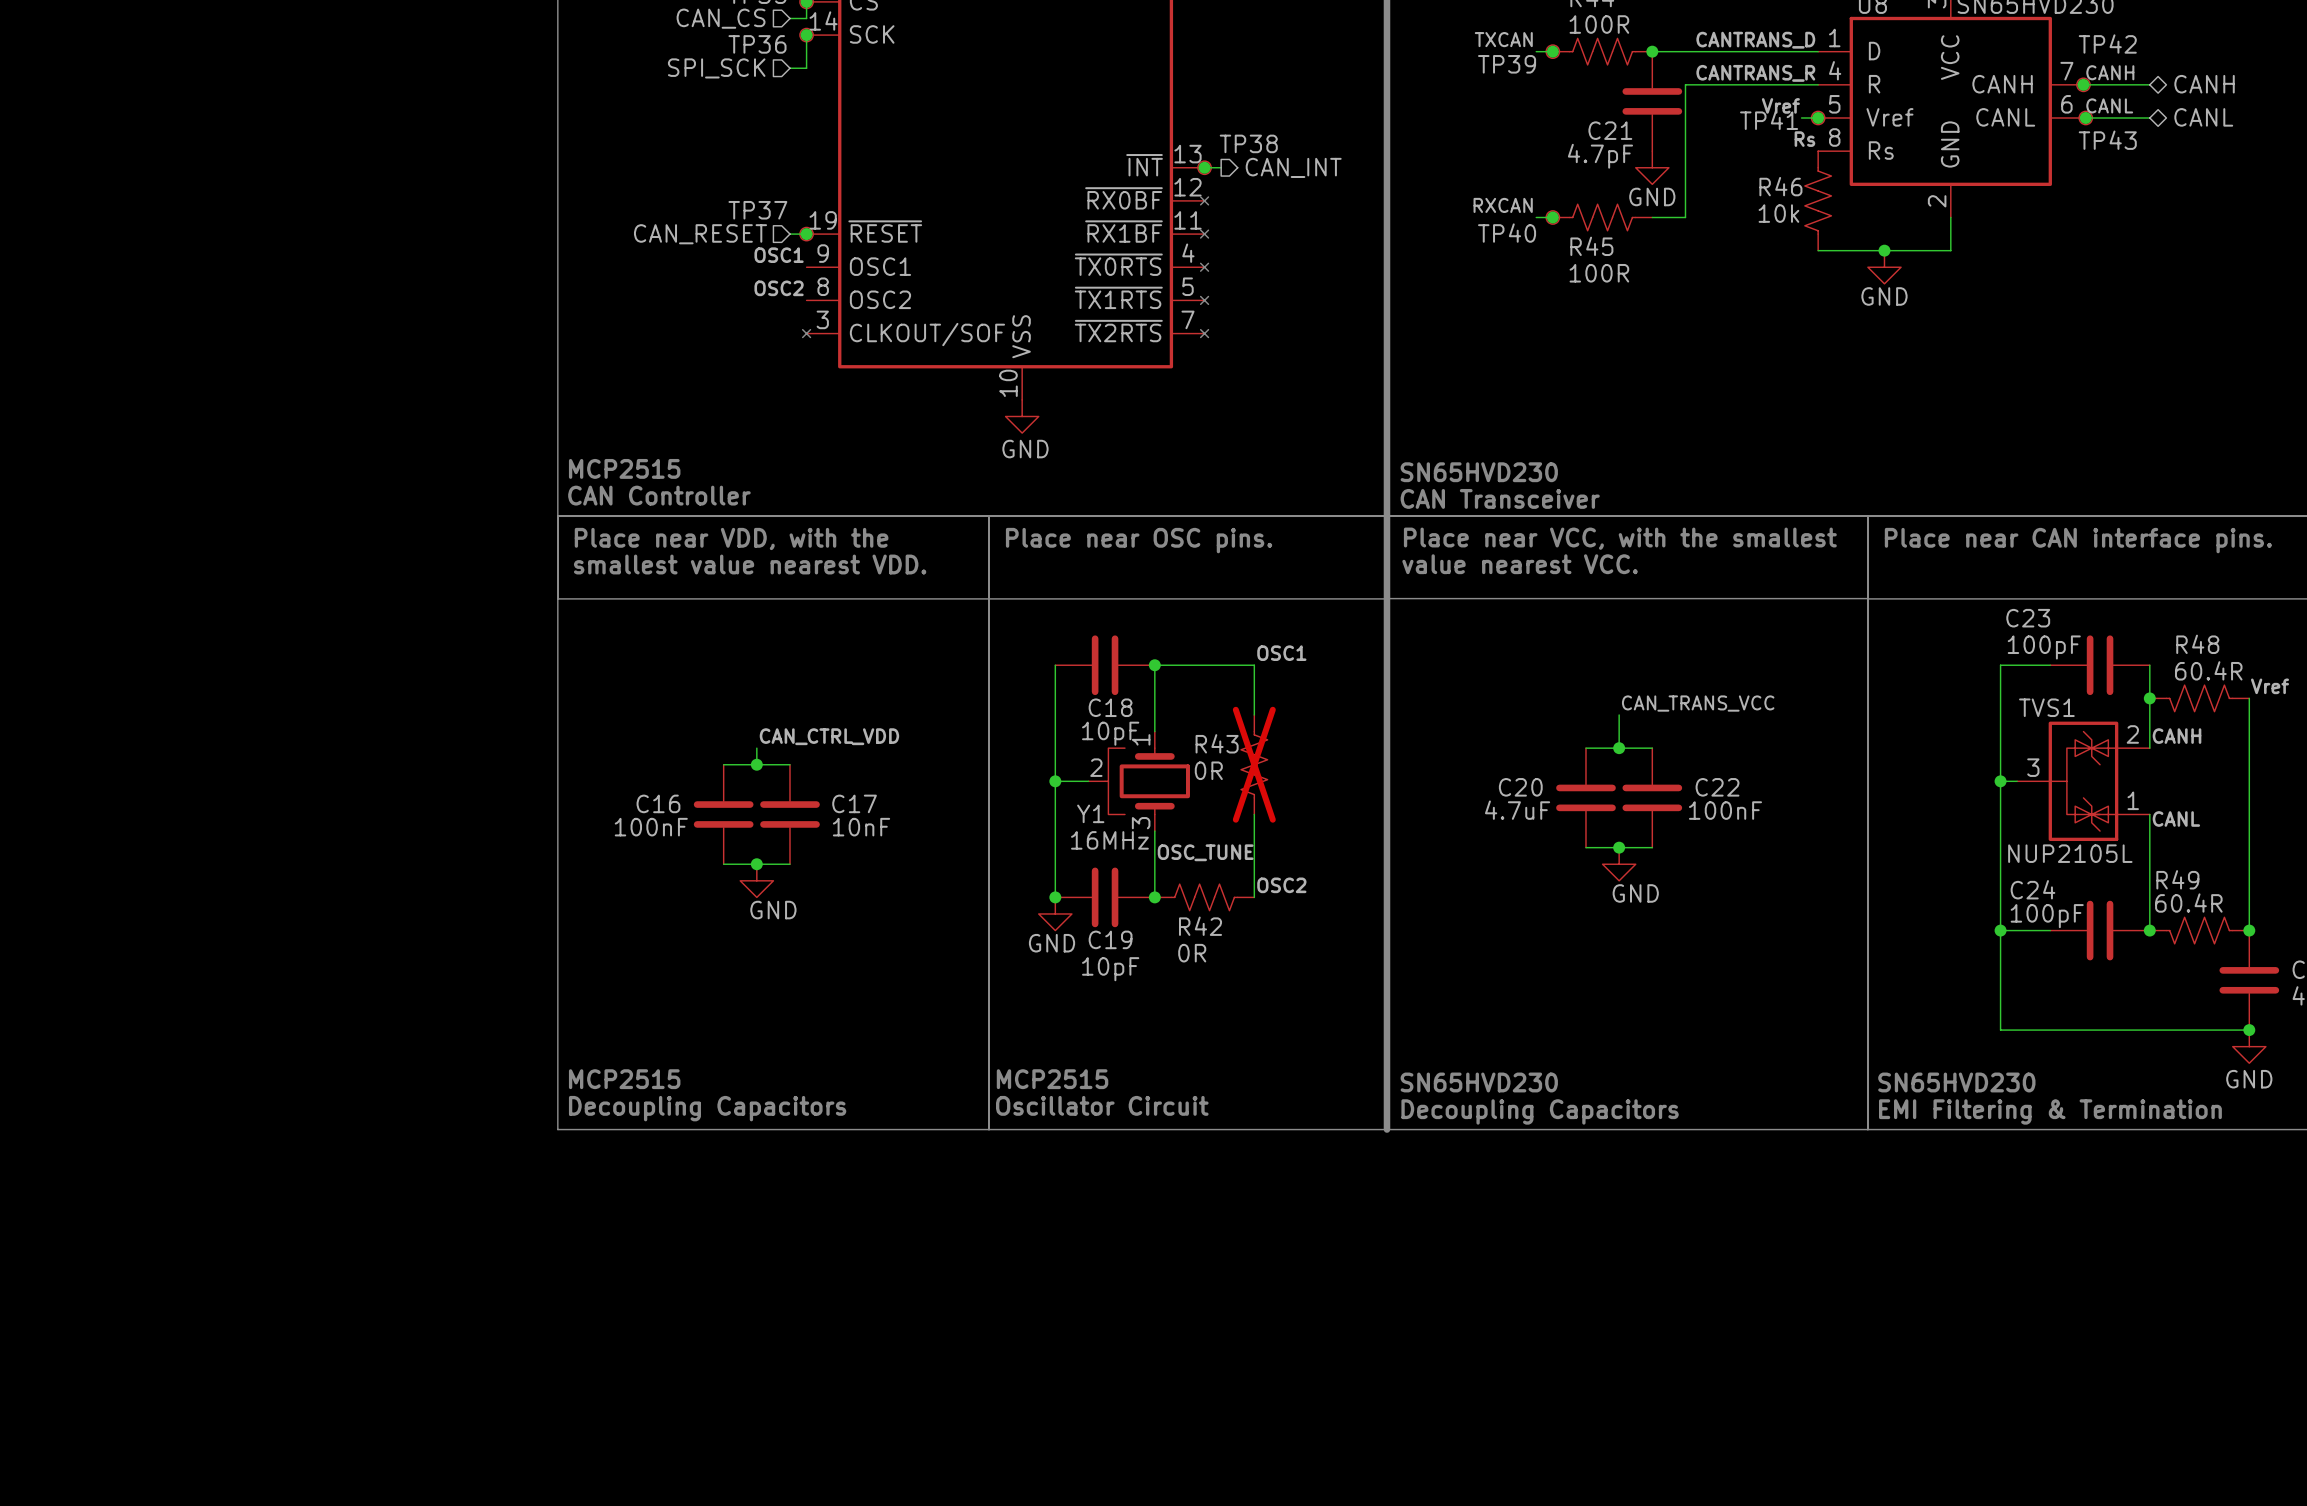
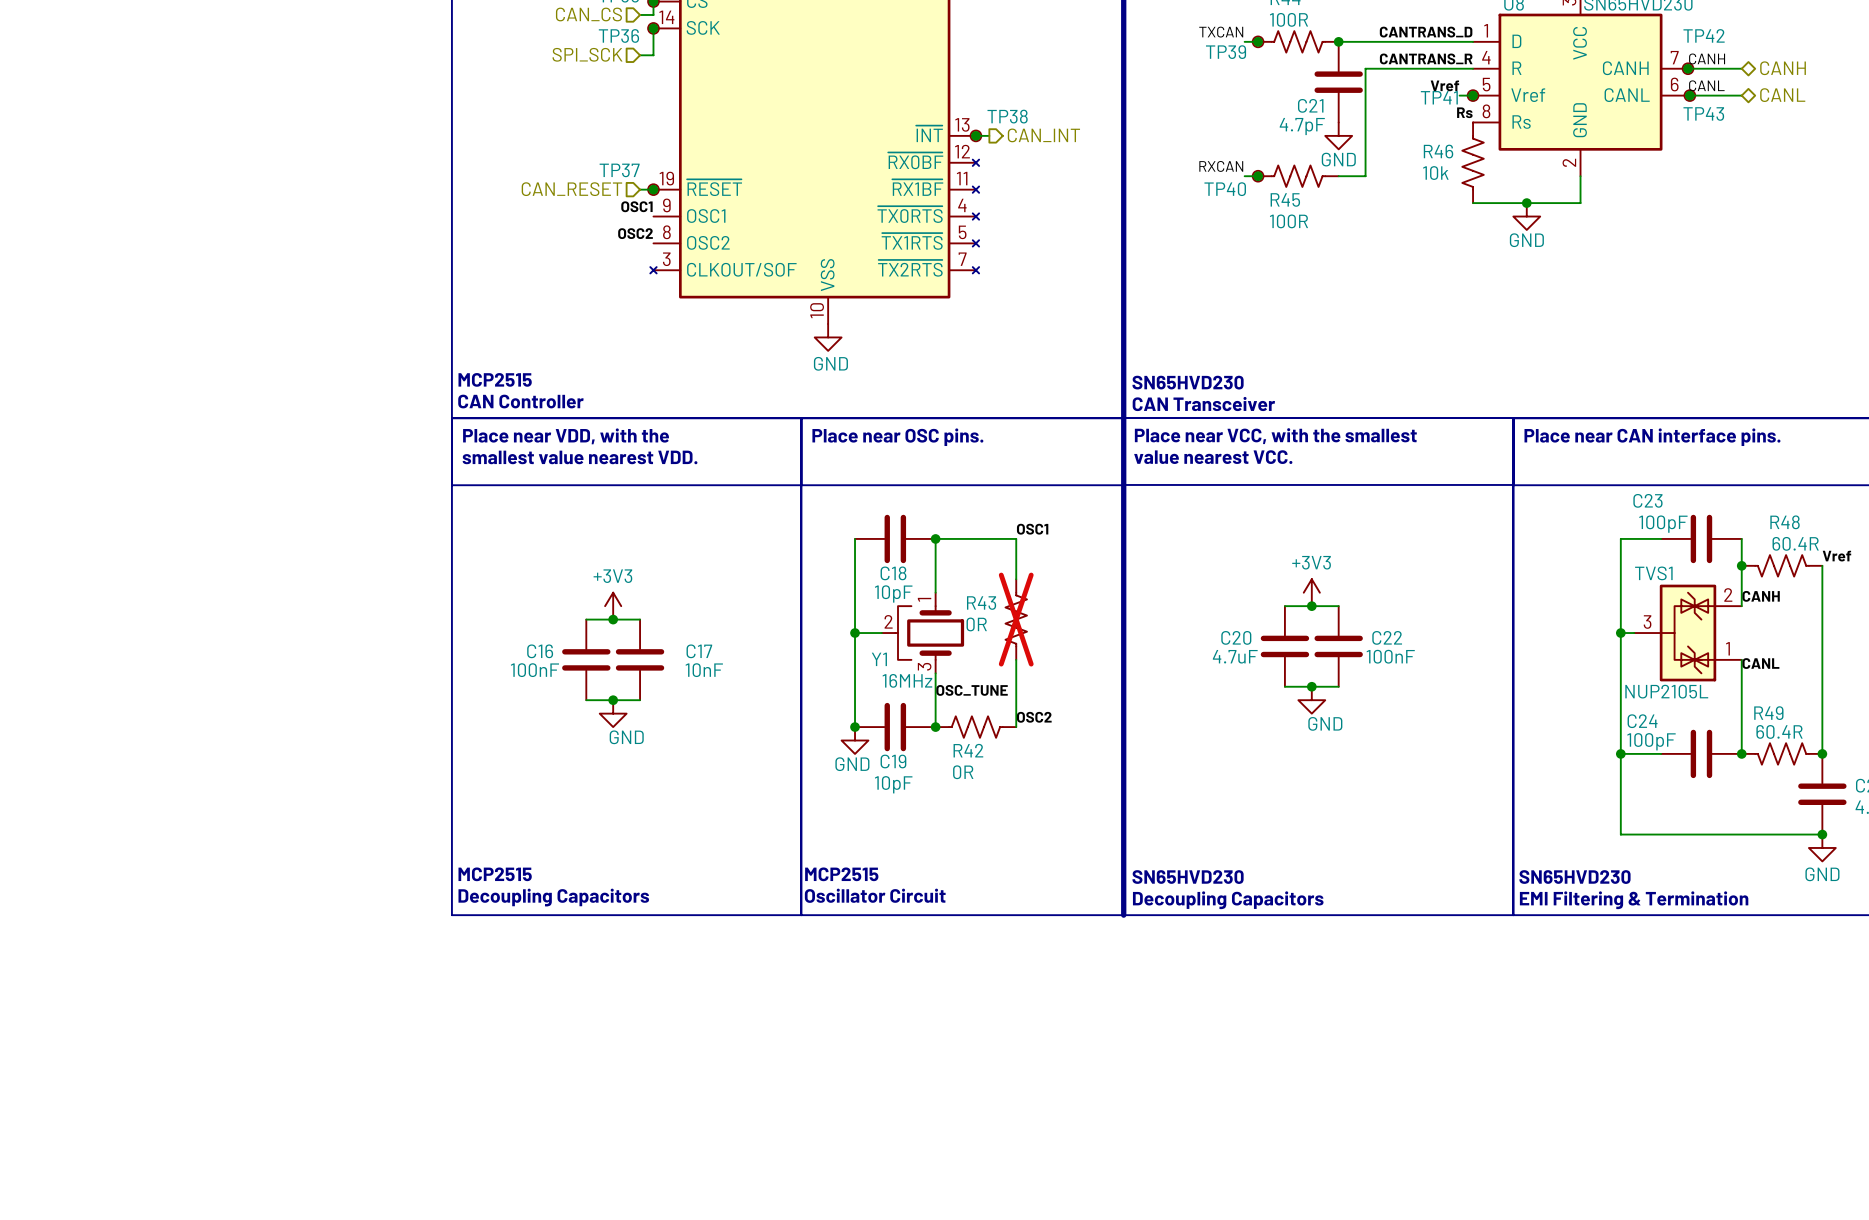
label: CAN_TRANS_VCC (1698, 703) -> none
power symbol: none -> +3V3 (1311, 592)
label: CAN_CTRL_VDD (829, 736) -> none
power symbol: none -> +3V3 (613, 606)

